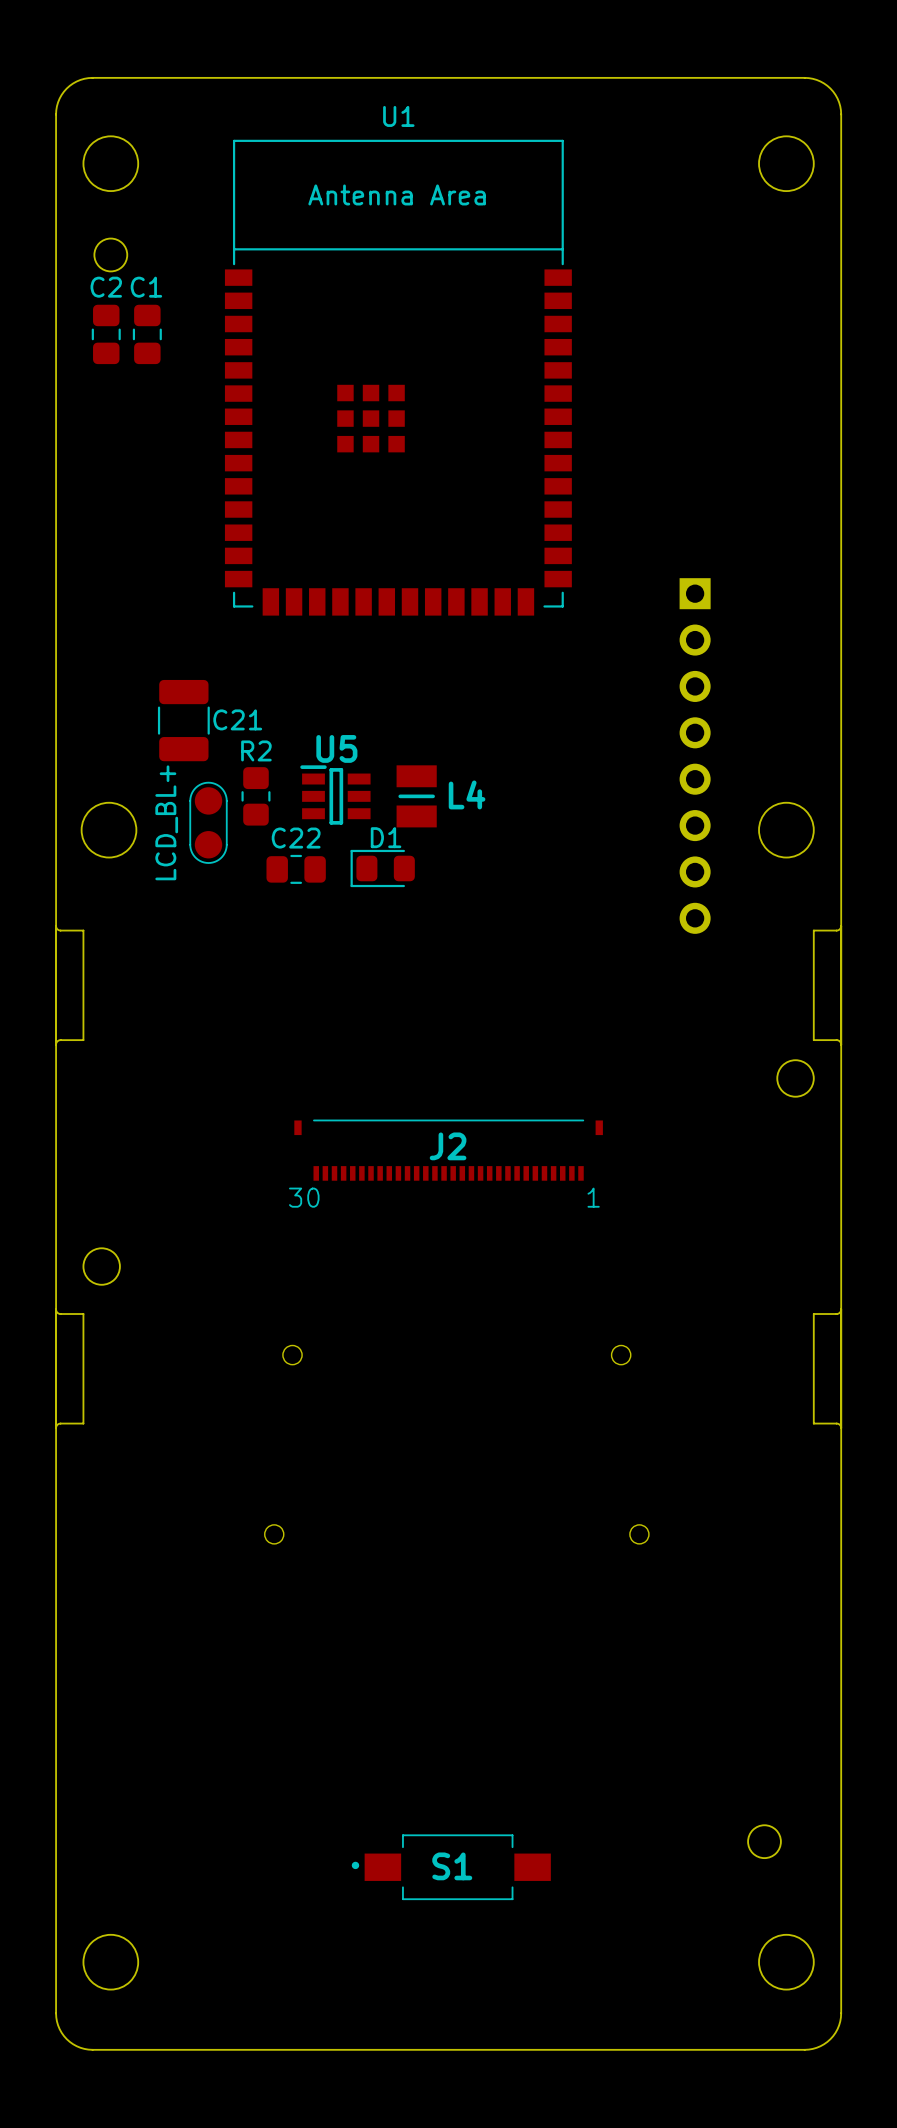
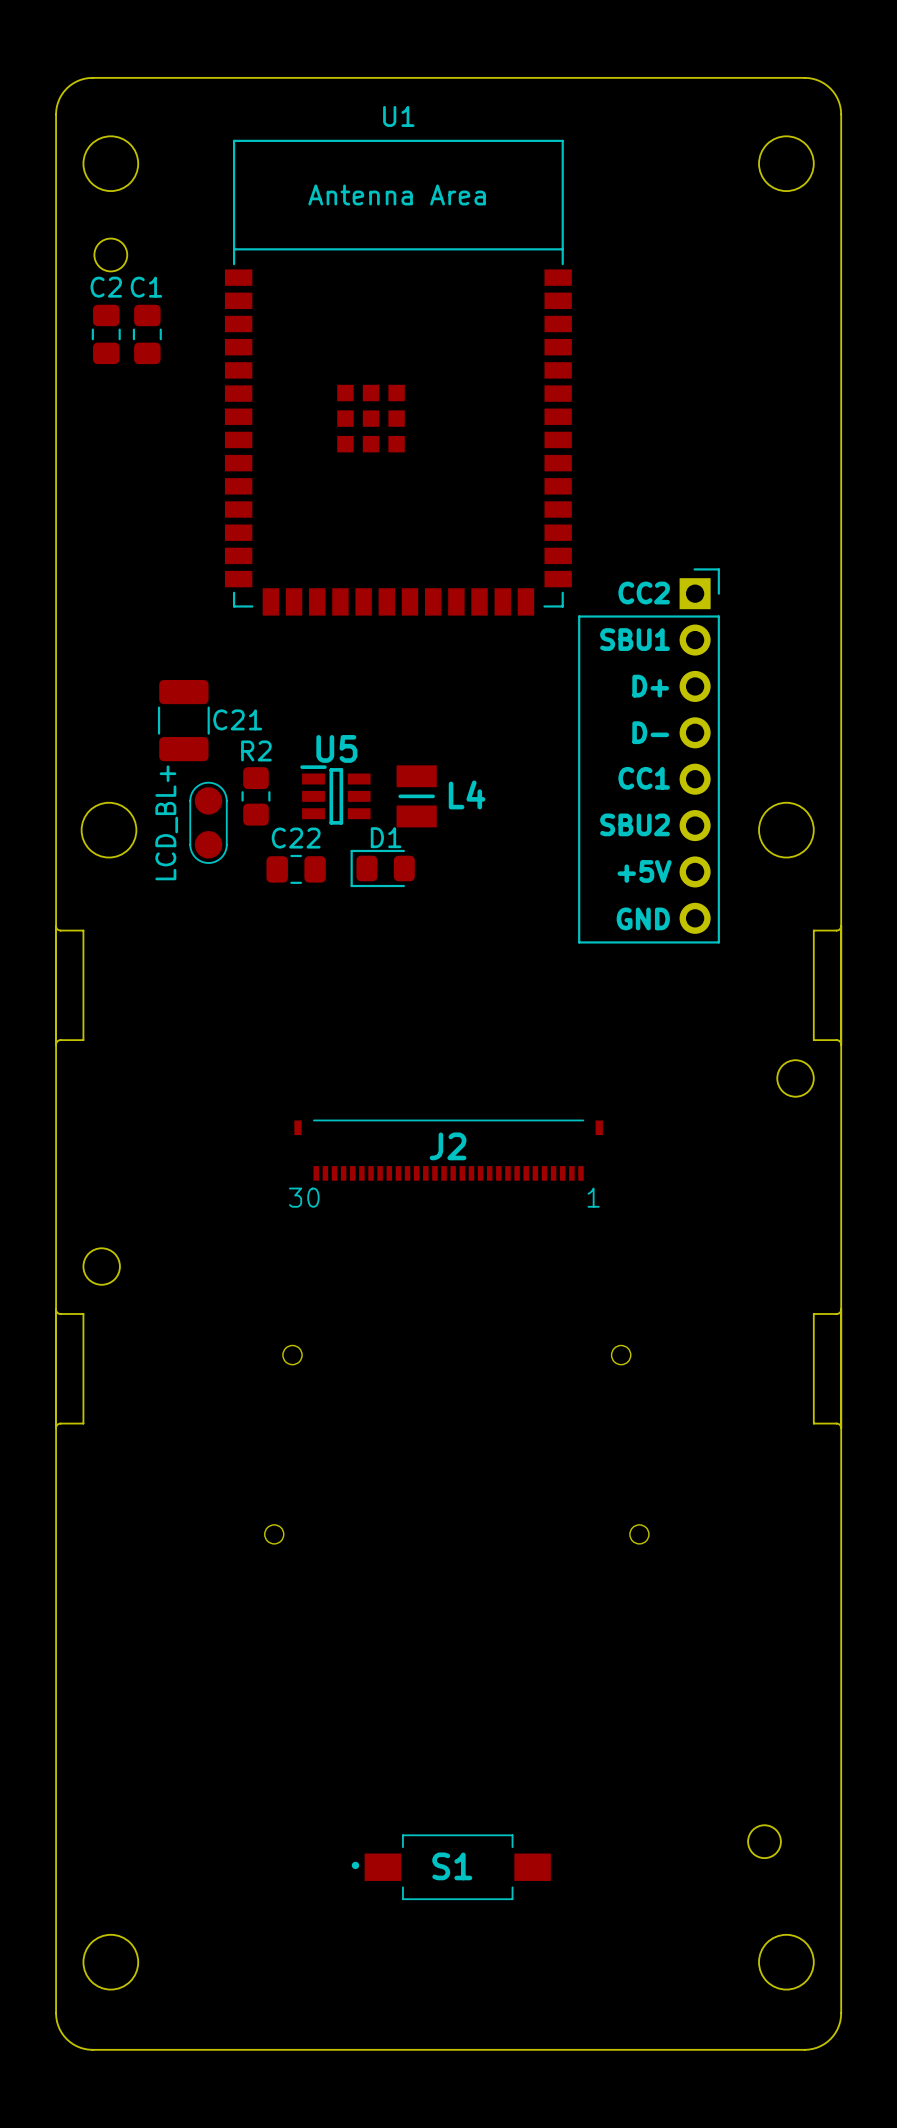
part: none -> (649, 755)

